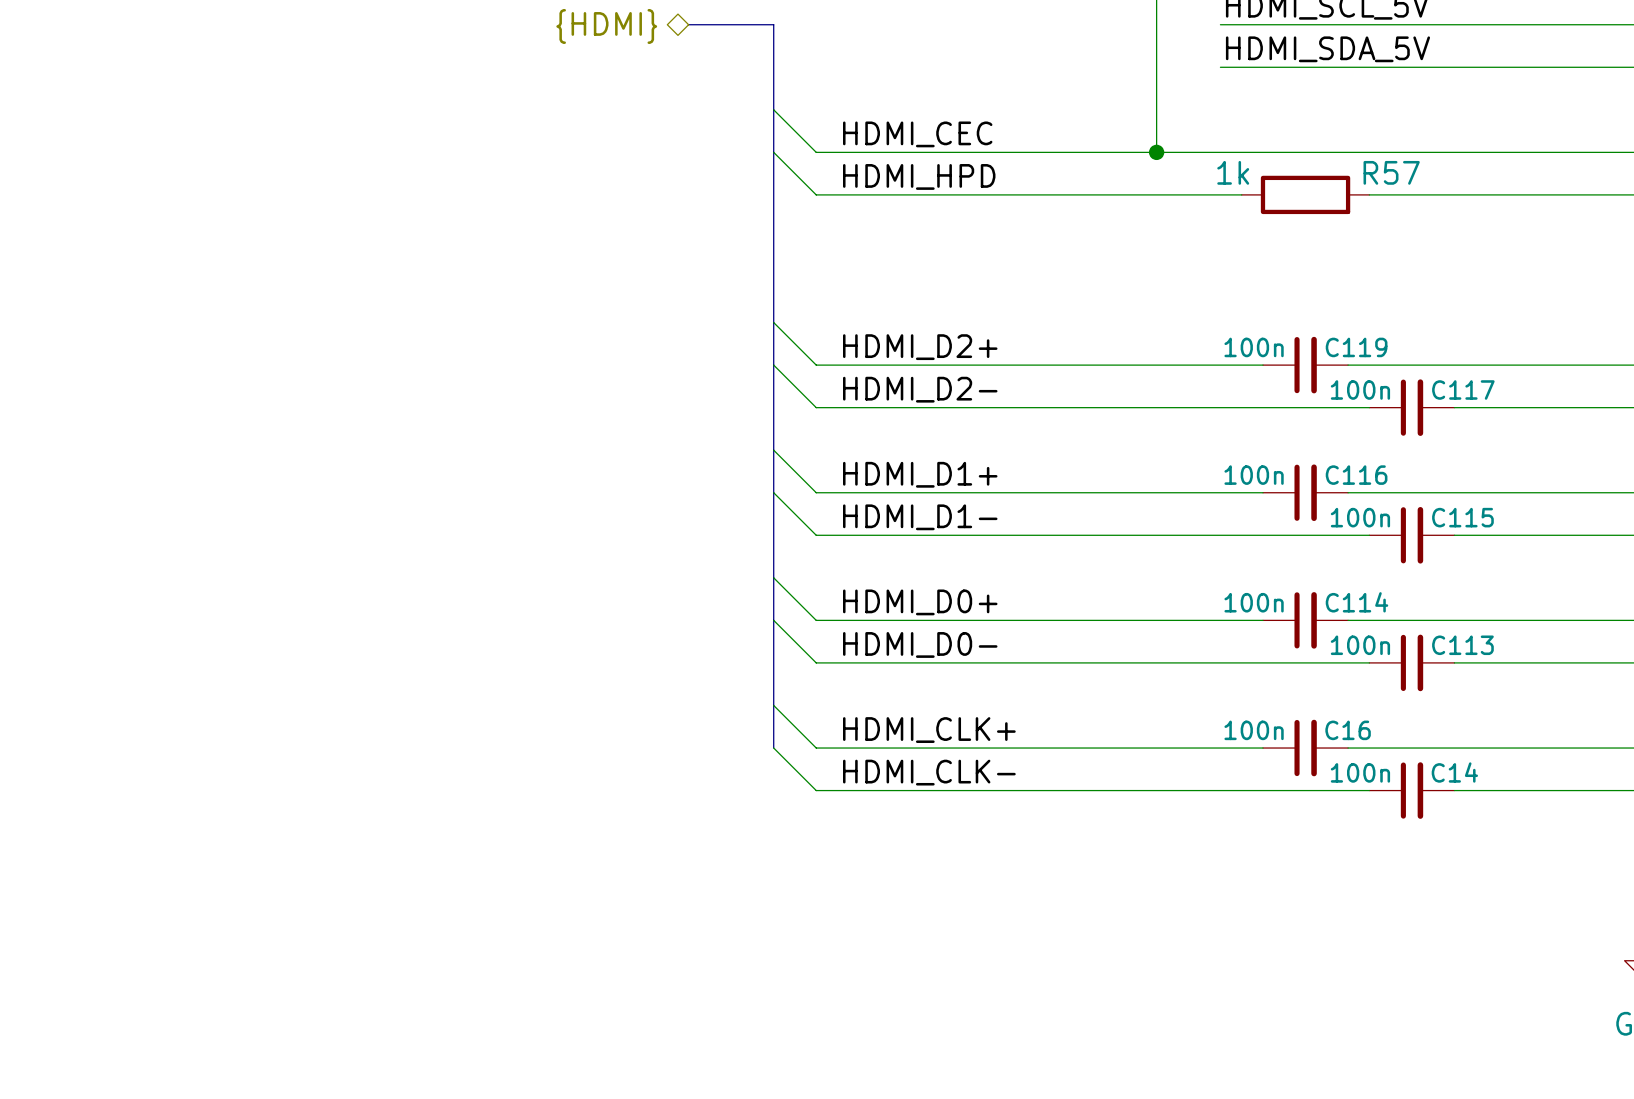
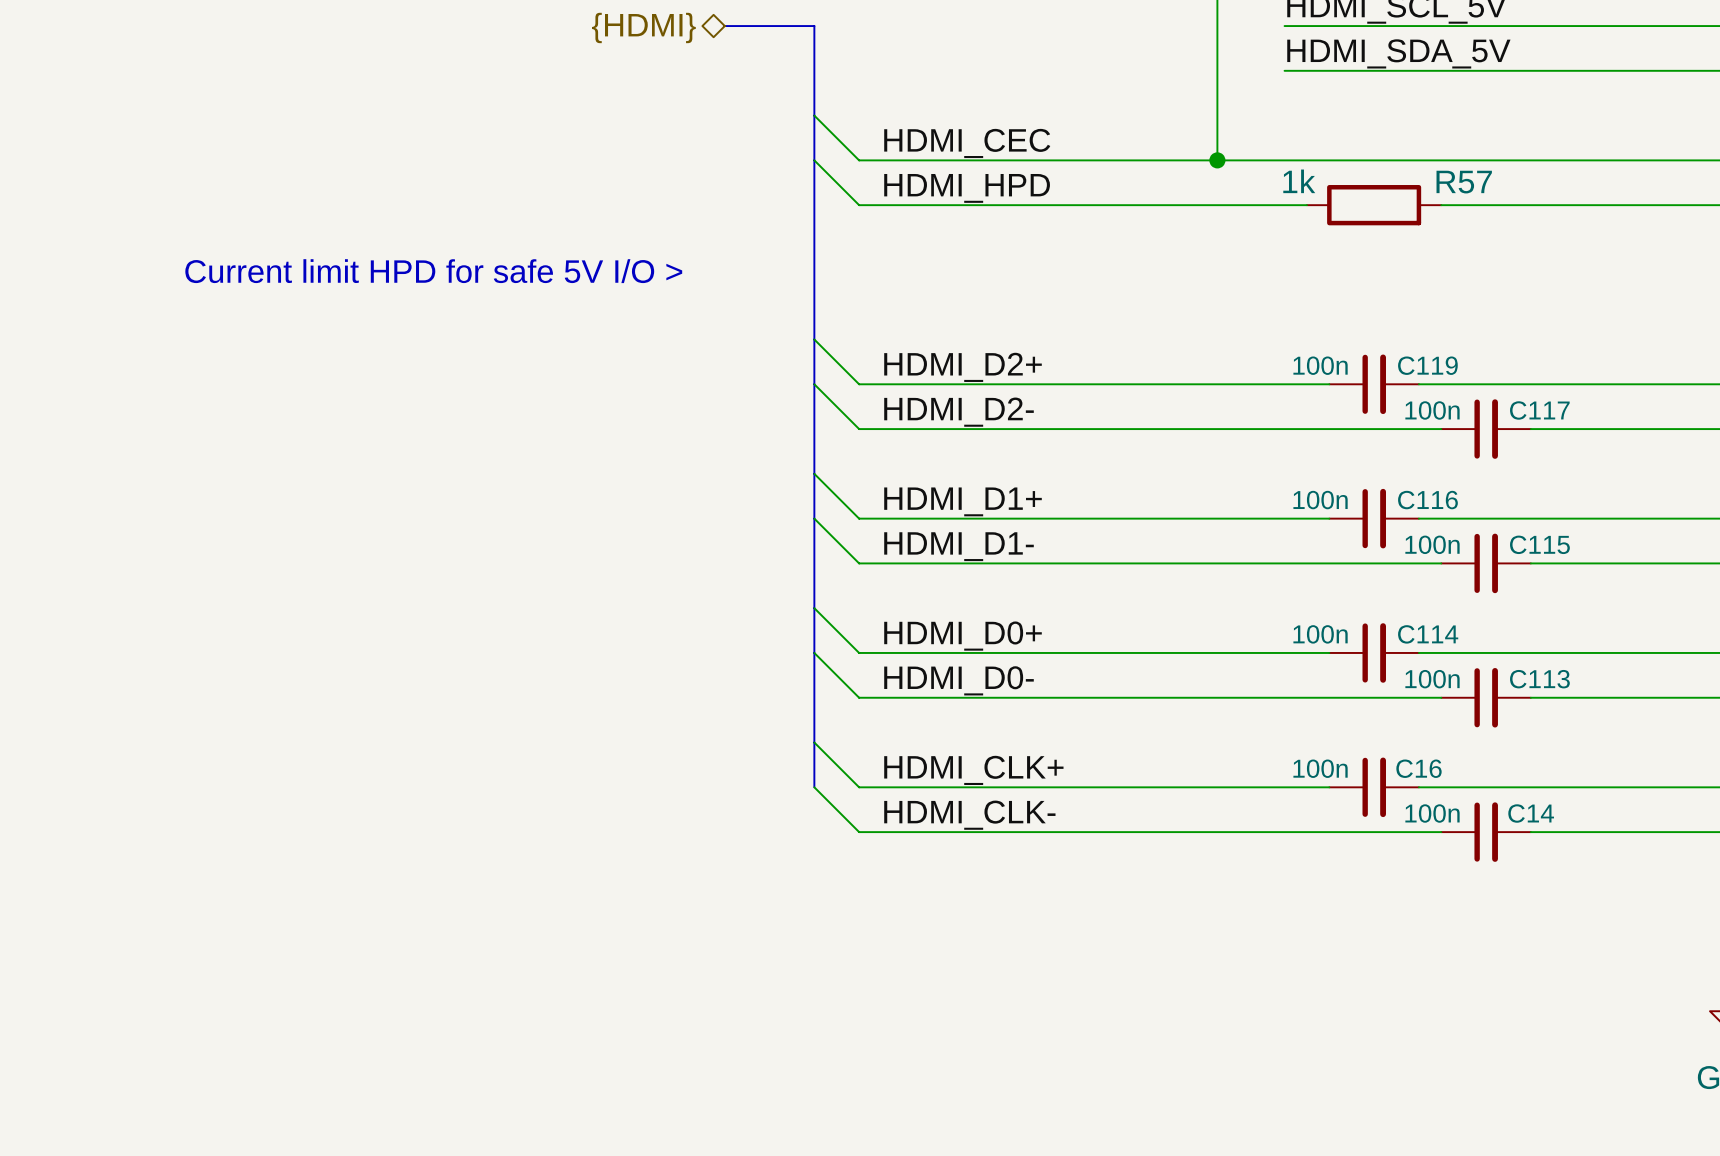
text: none -> Current limit HPD for safe 5V I/O > (433, 271)

